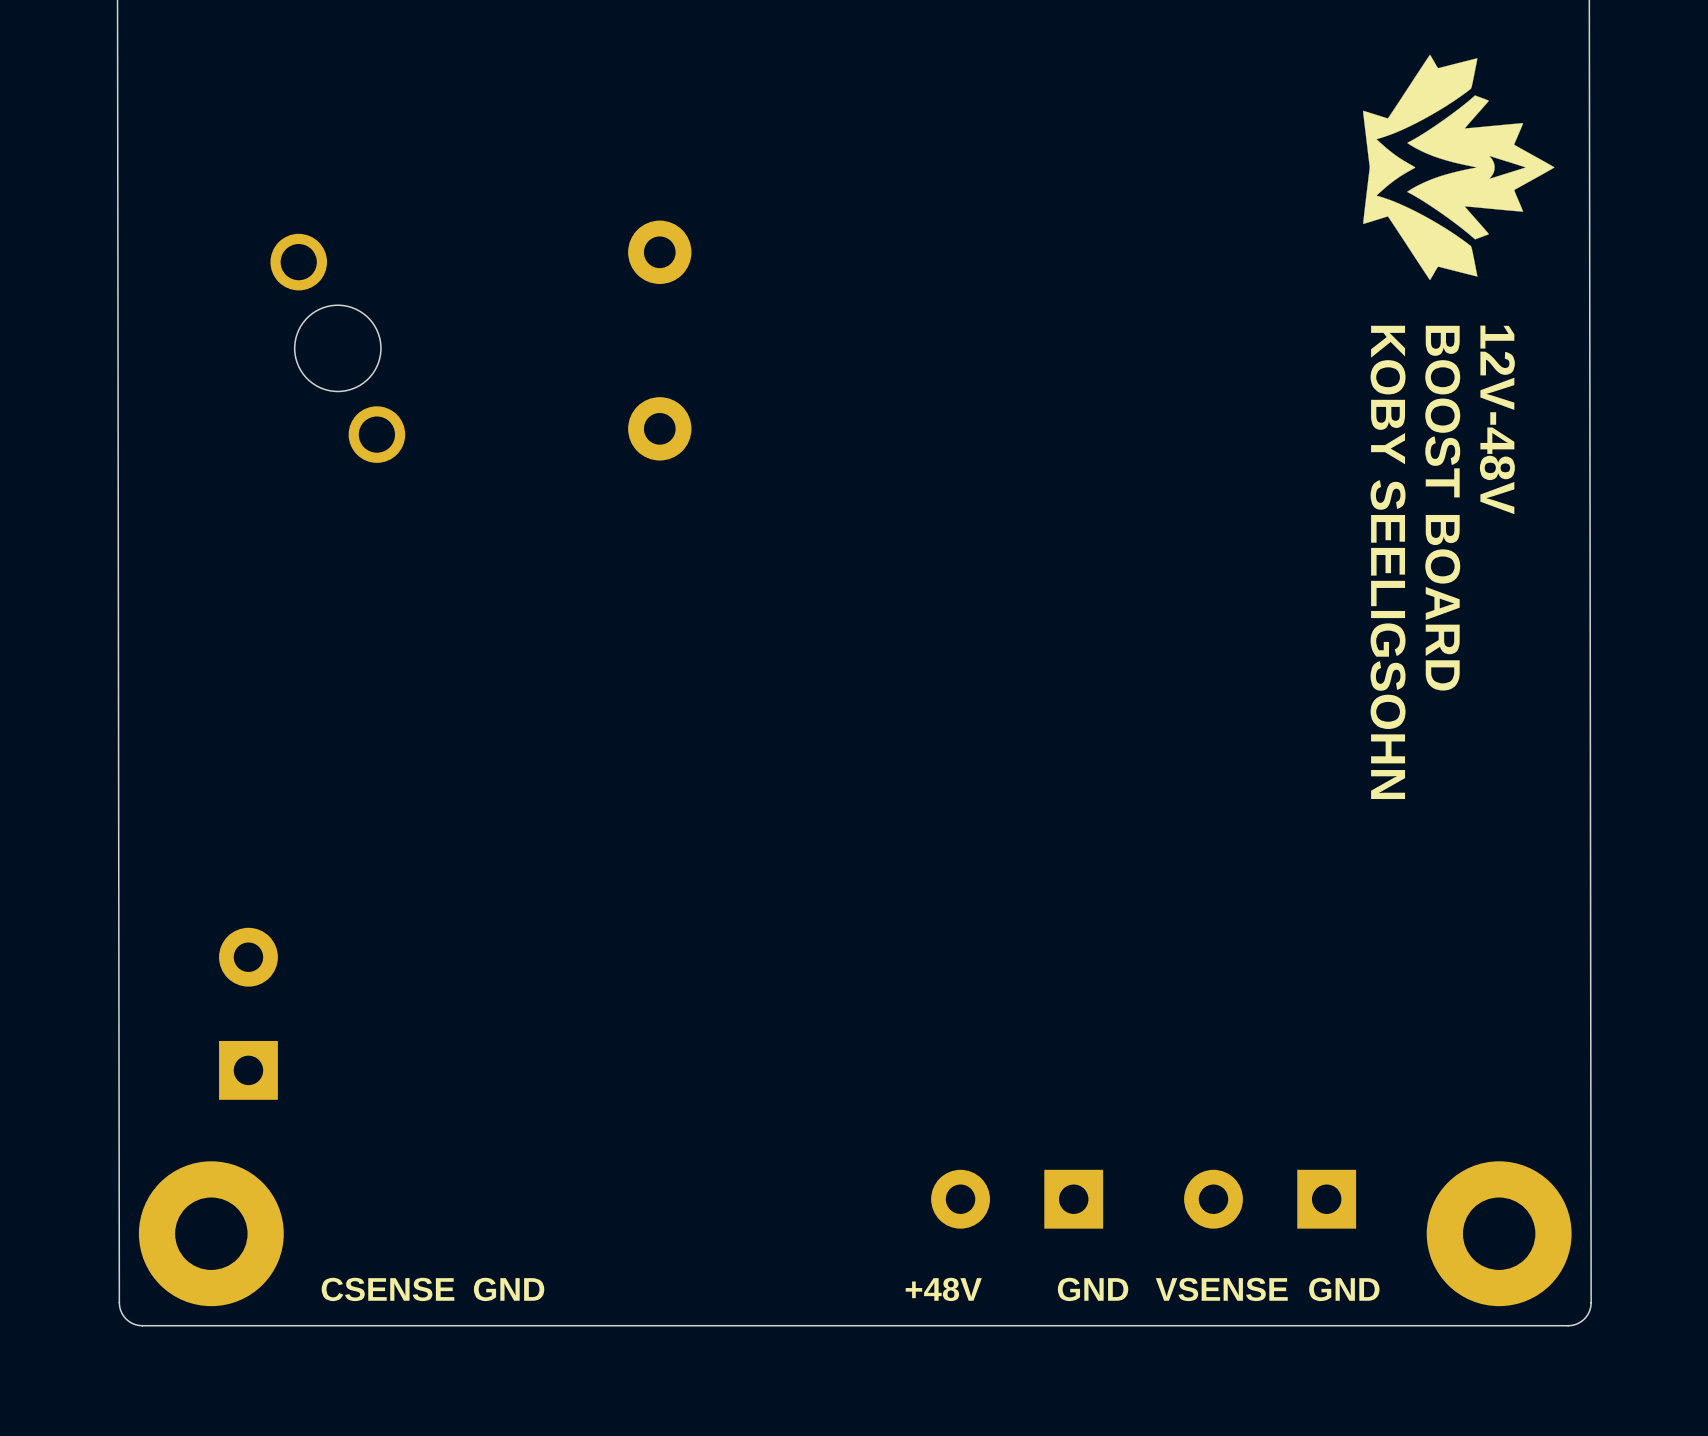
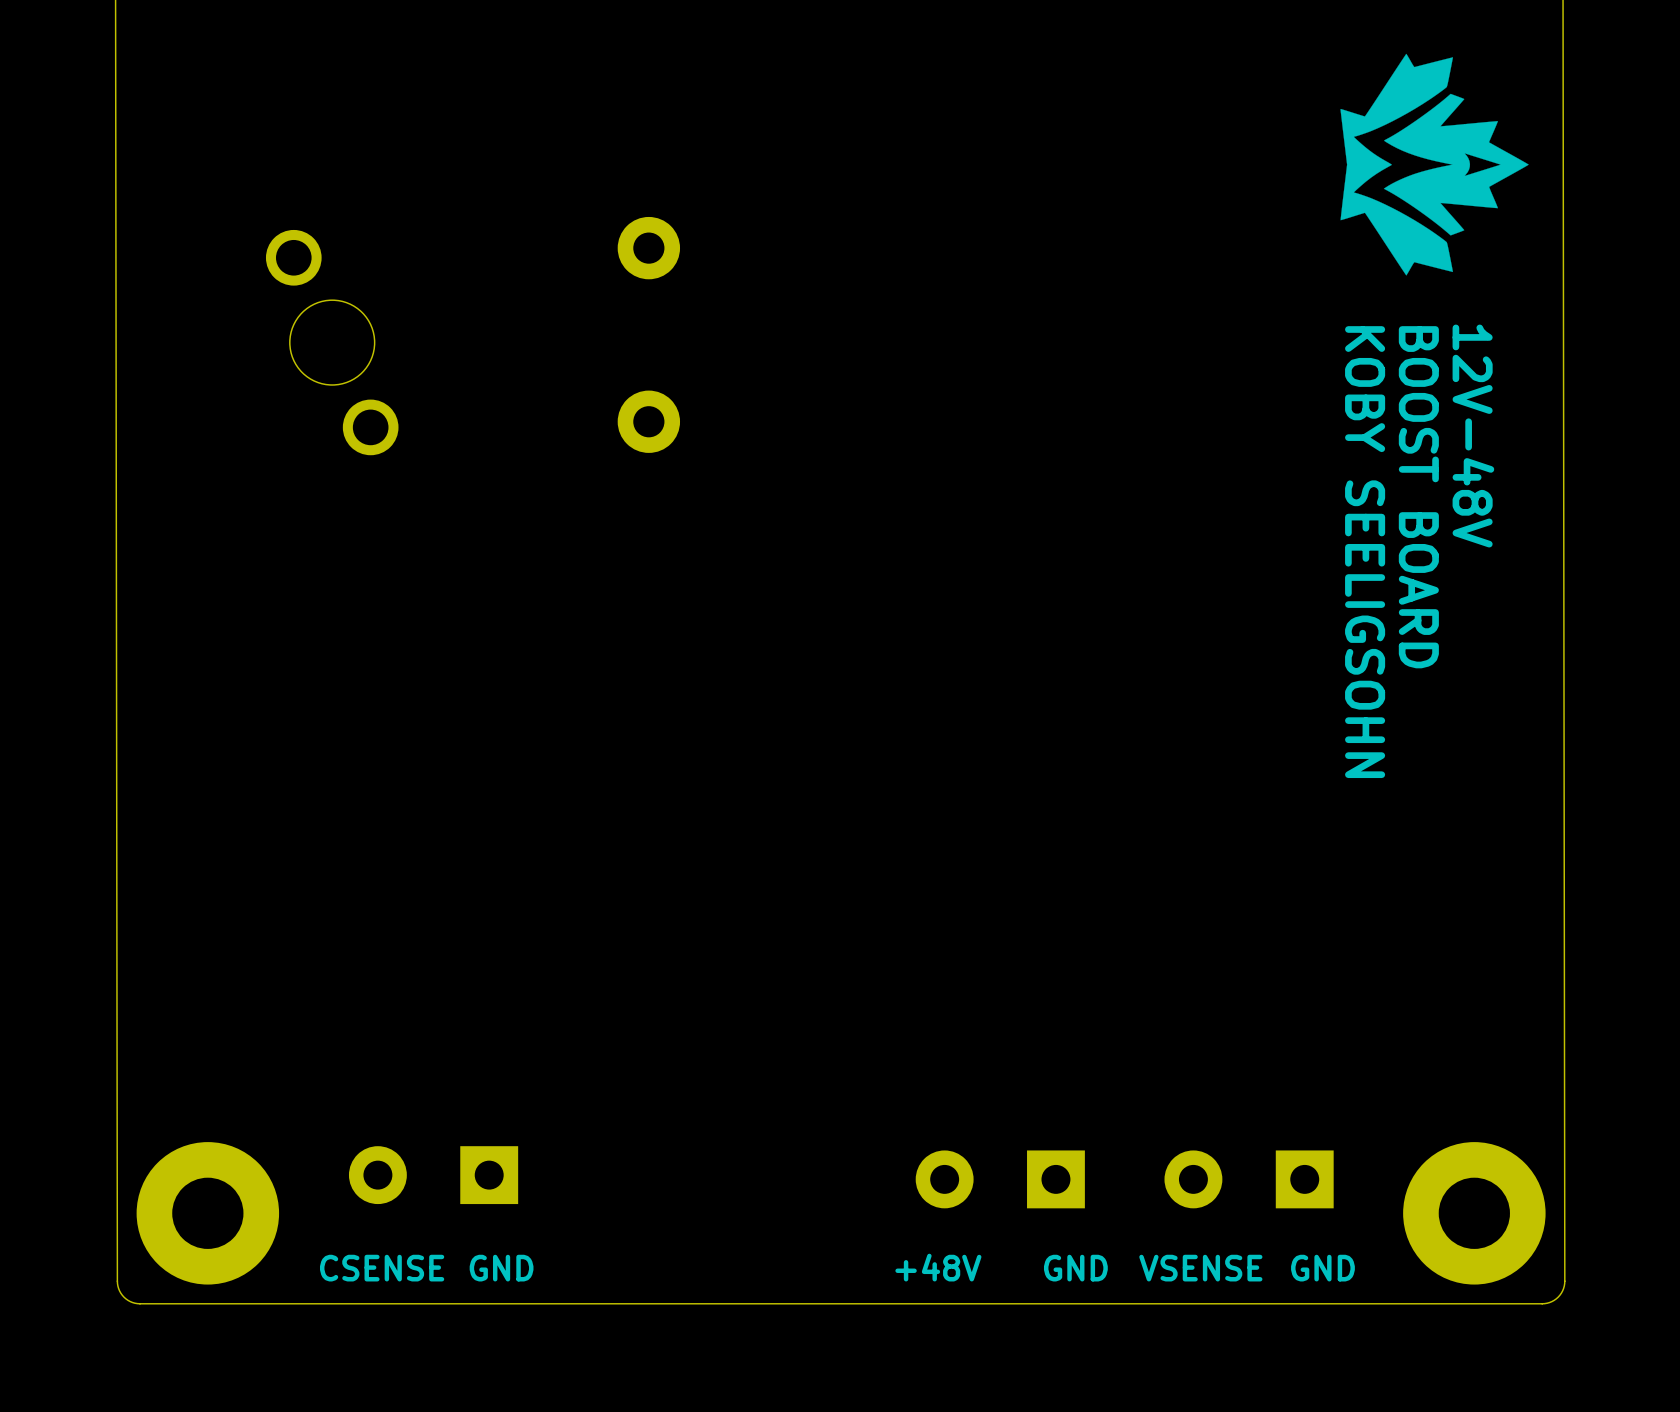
part rotation: 0° (248, 1013) -> 90° counterclockwise (433, 1175)
part position: (248, 1013) -> (433, 1175)

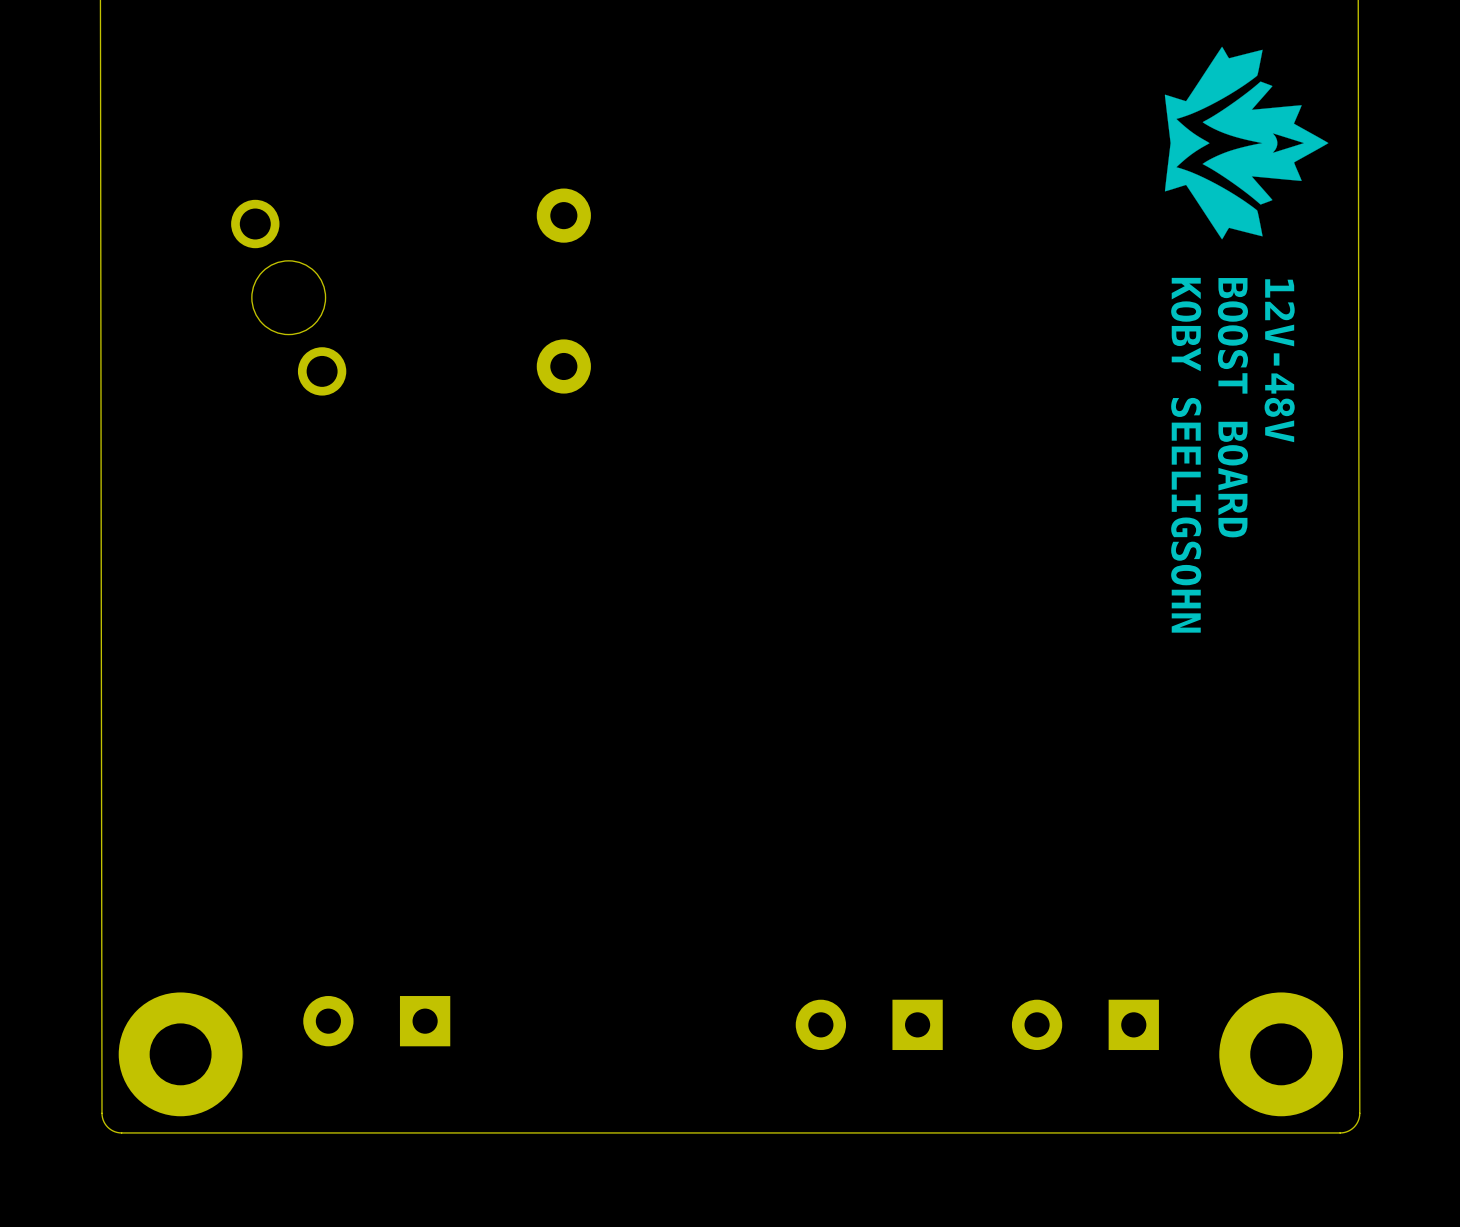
text: +48V (938, 1267) -> none
text: CSENSE (382, 1268) -> none
text: GND (501, 1268) -> none
text: GND (1075, 1268) -> none
text: VSENSE (1200, 1268) -> none
text: GND (1322, 1268) -> none

